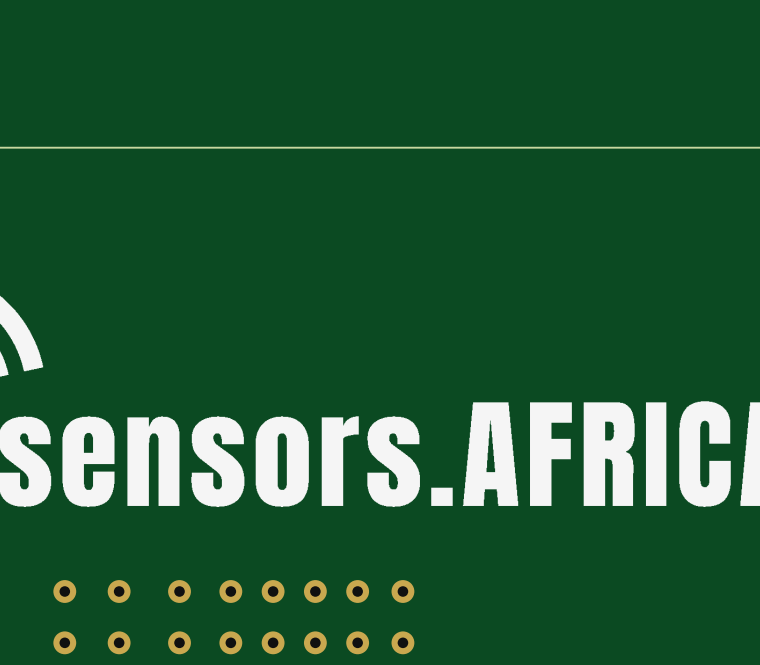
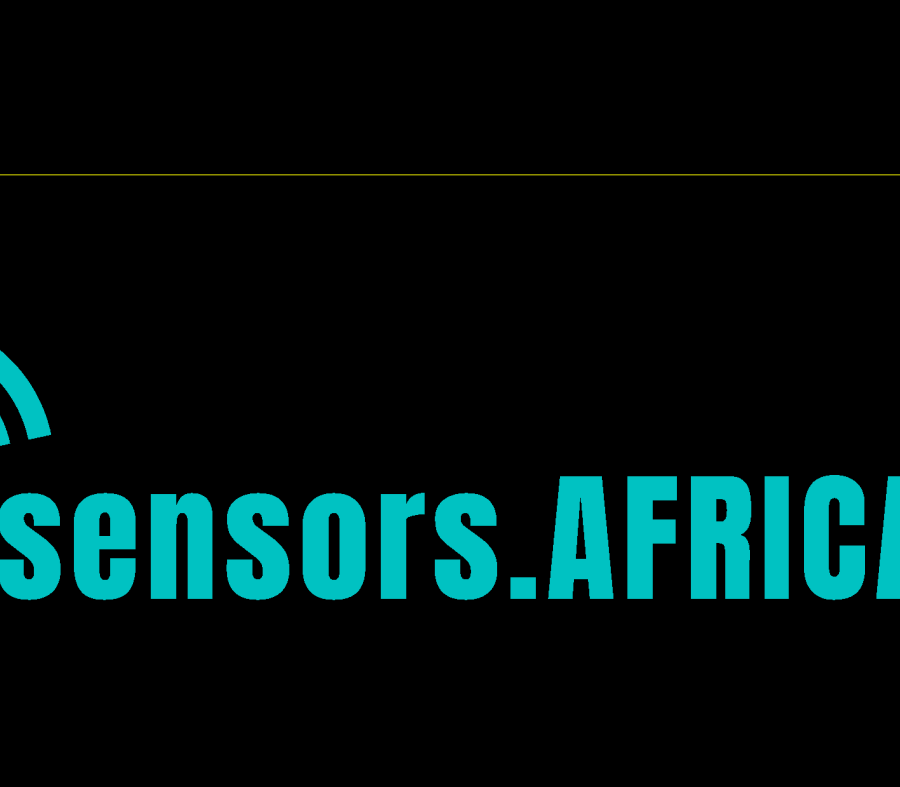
via: (64, 591) -> none
via: (119, 591) -> none
via: (179, 591) -> none
via: (230, 591) -> none
via: (273, 591) -> none
via: (315, 591) -> none
via: (357, 591) -> none
via: (402, 591) -> none
via: (64, 642) -> none
via: (119, 642) -> none
via: (179, 642) -> none
via: (230, 642) -> none
via: (273, 642) -> none
via: (315, 642) -> none
via: (357, 642) -> none
via: (402, 642) -> none

